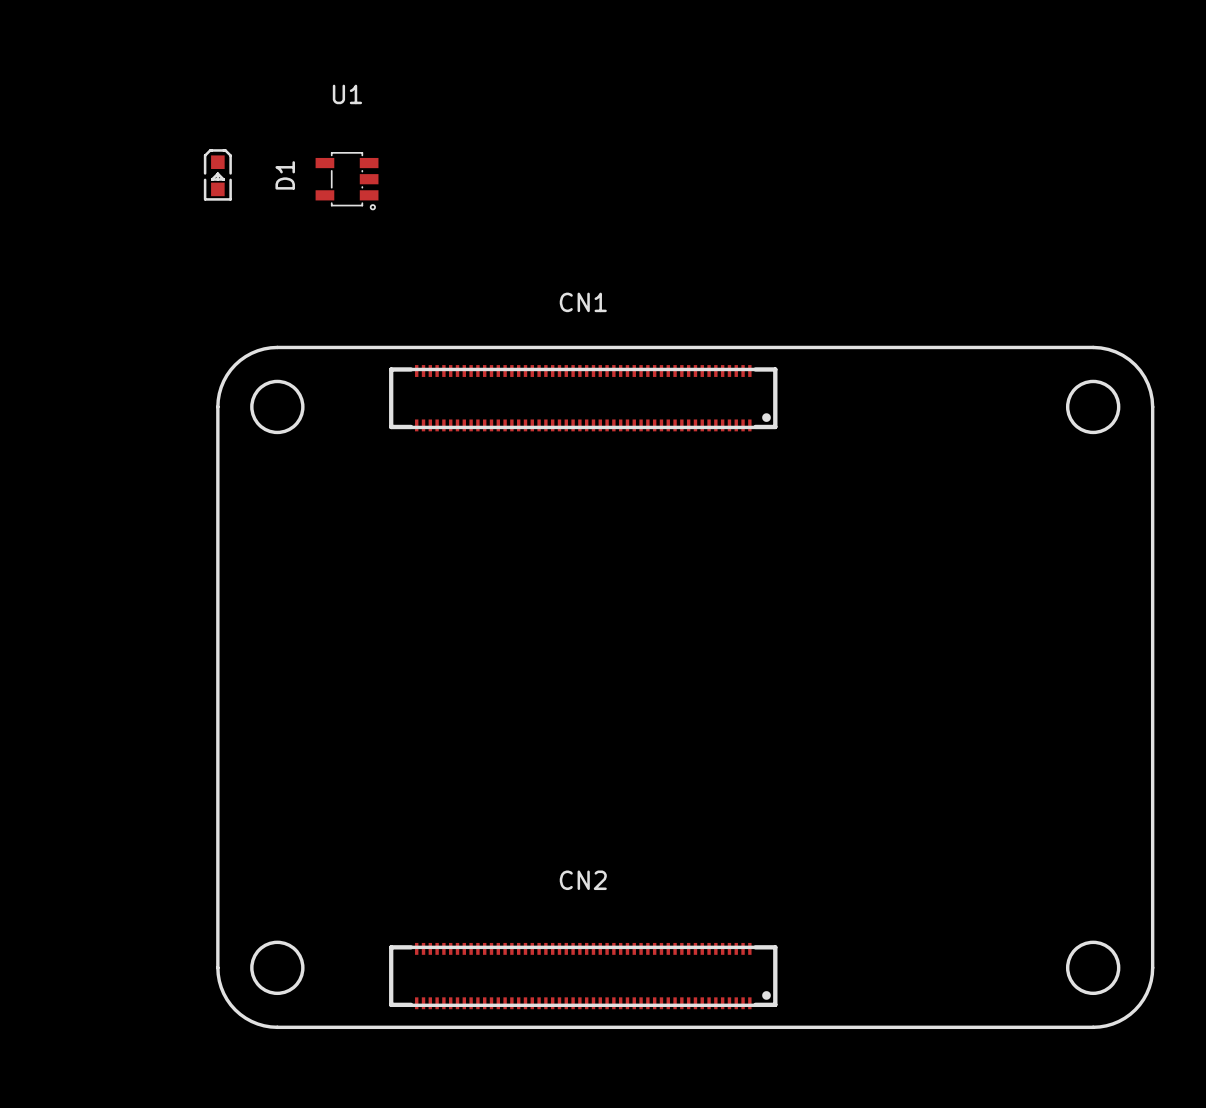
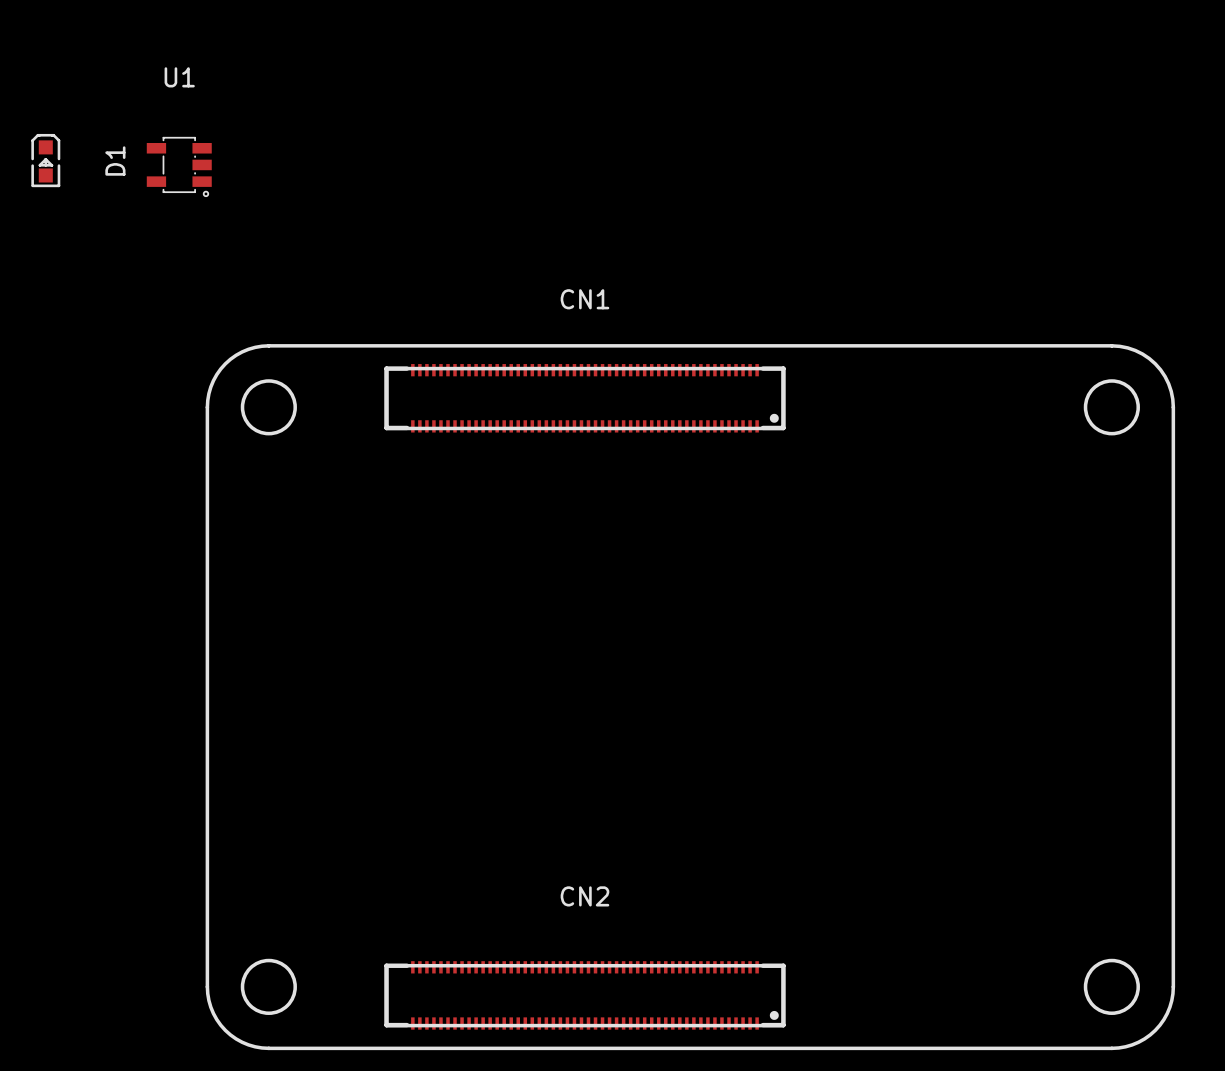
D1 position: (217, 174) -> (45, 160)
U1 position: (347, 181) -> (179, 166)

